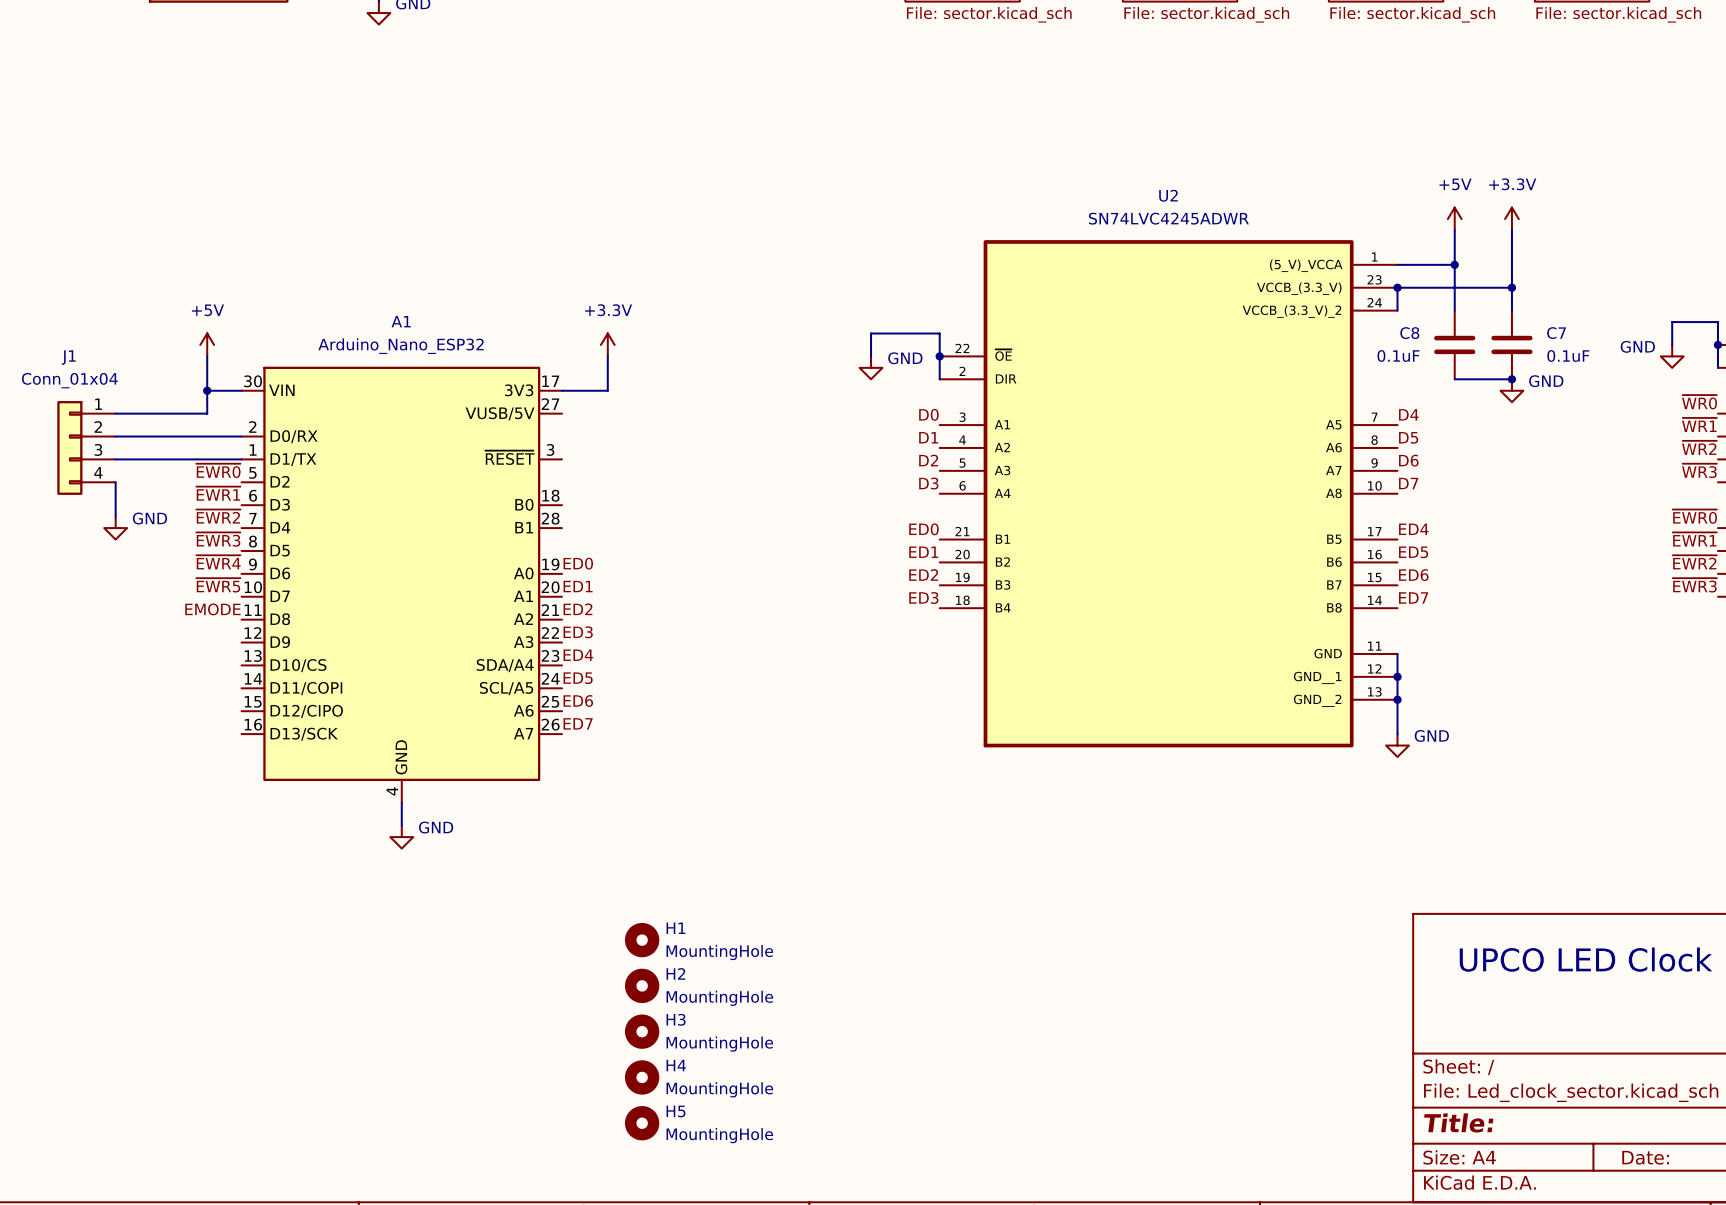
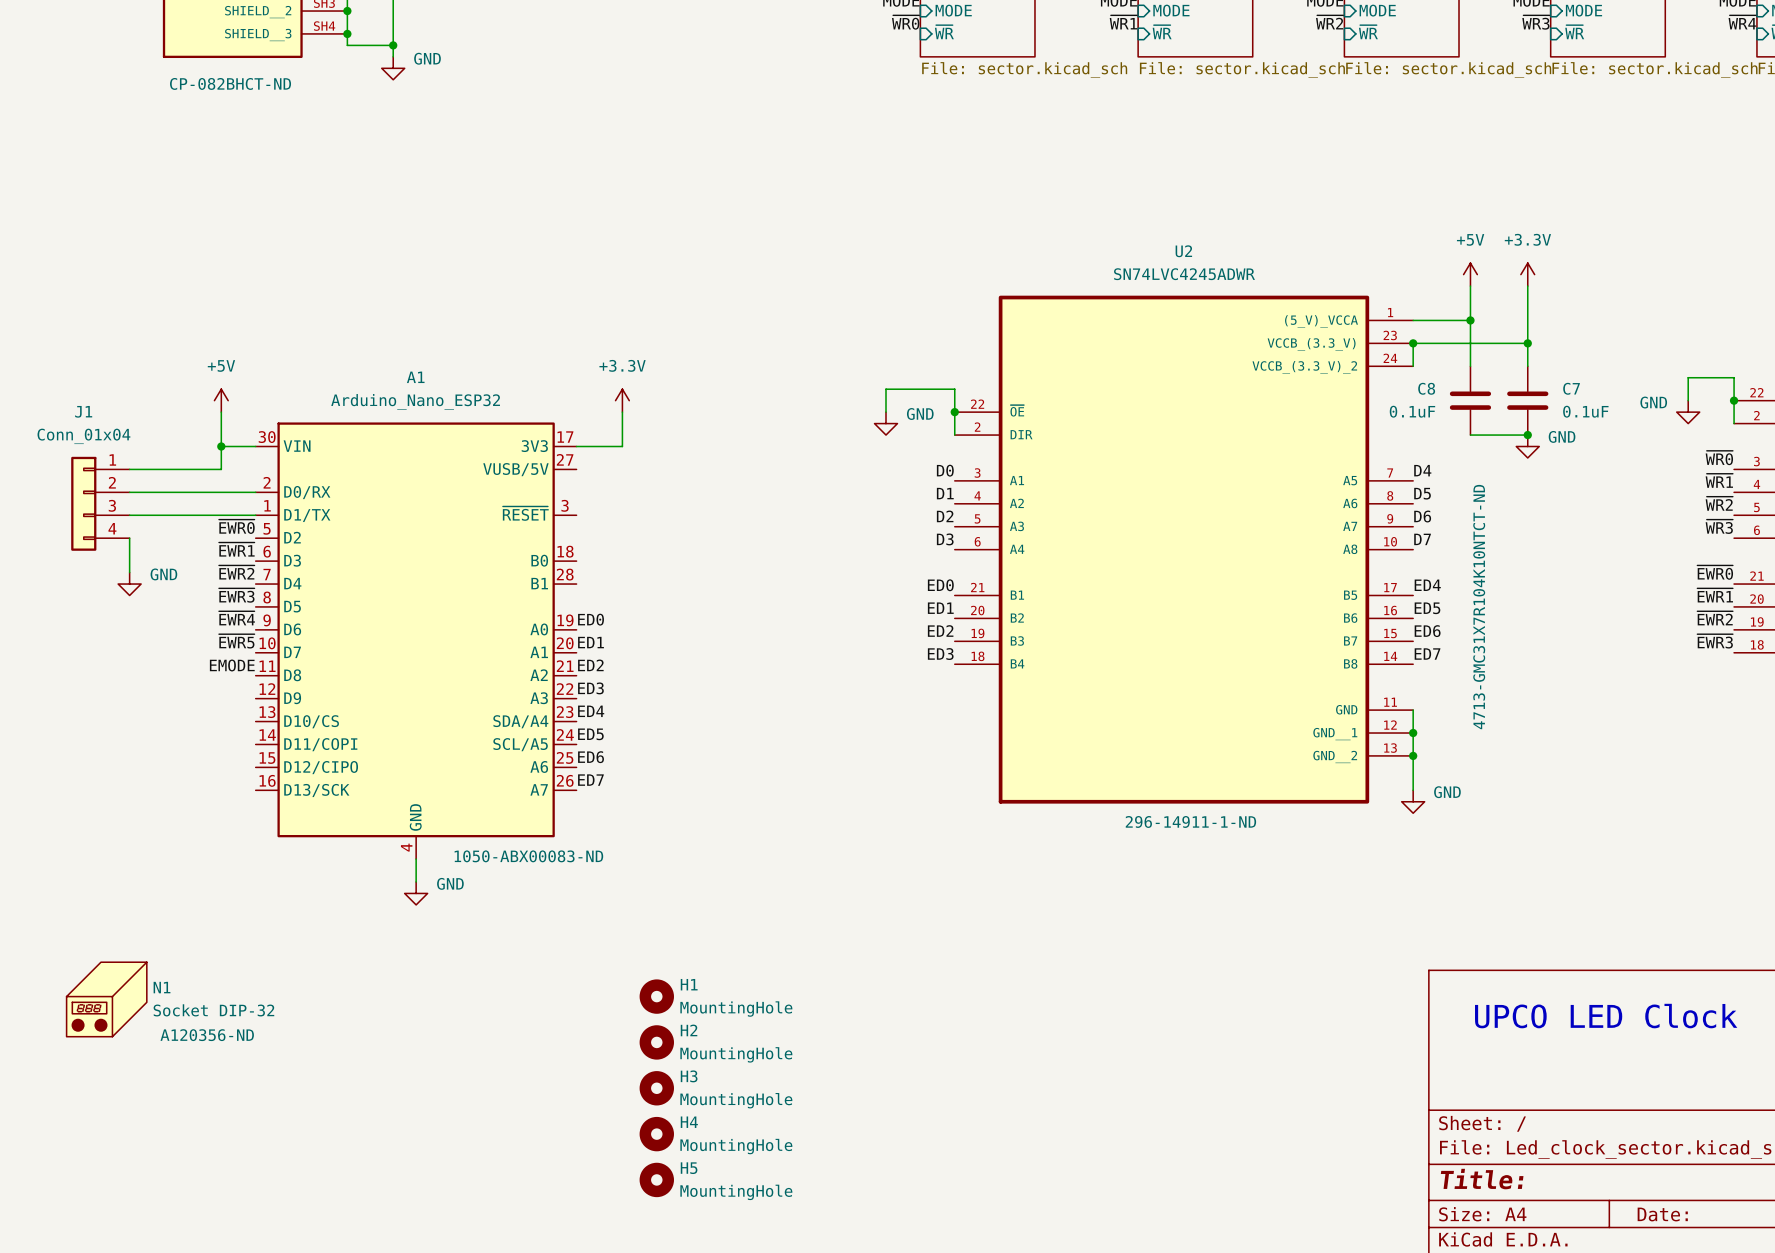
part text: none -> CP-082BHCT-ND (230, 83)
C8 text: none -> 4713-GMC31X7R104K10NTCT-ND (1479, 607)
U2 text: none -> 296-14911-1-ND (1190, 821)
A1 text: none -> 1050-ABX00083-ND (528, 856)
N1: none -> Socket DIP-32 (106, 999)

